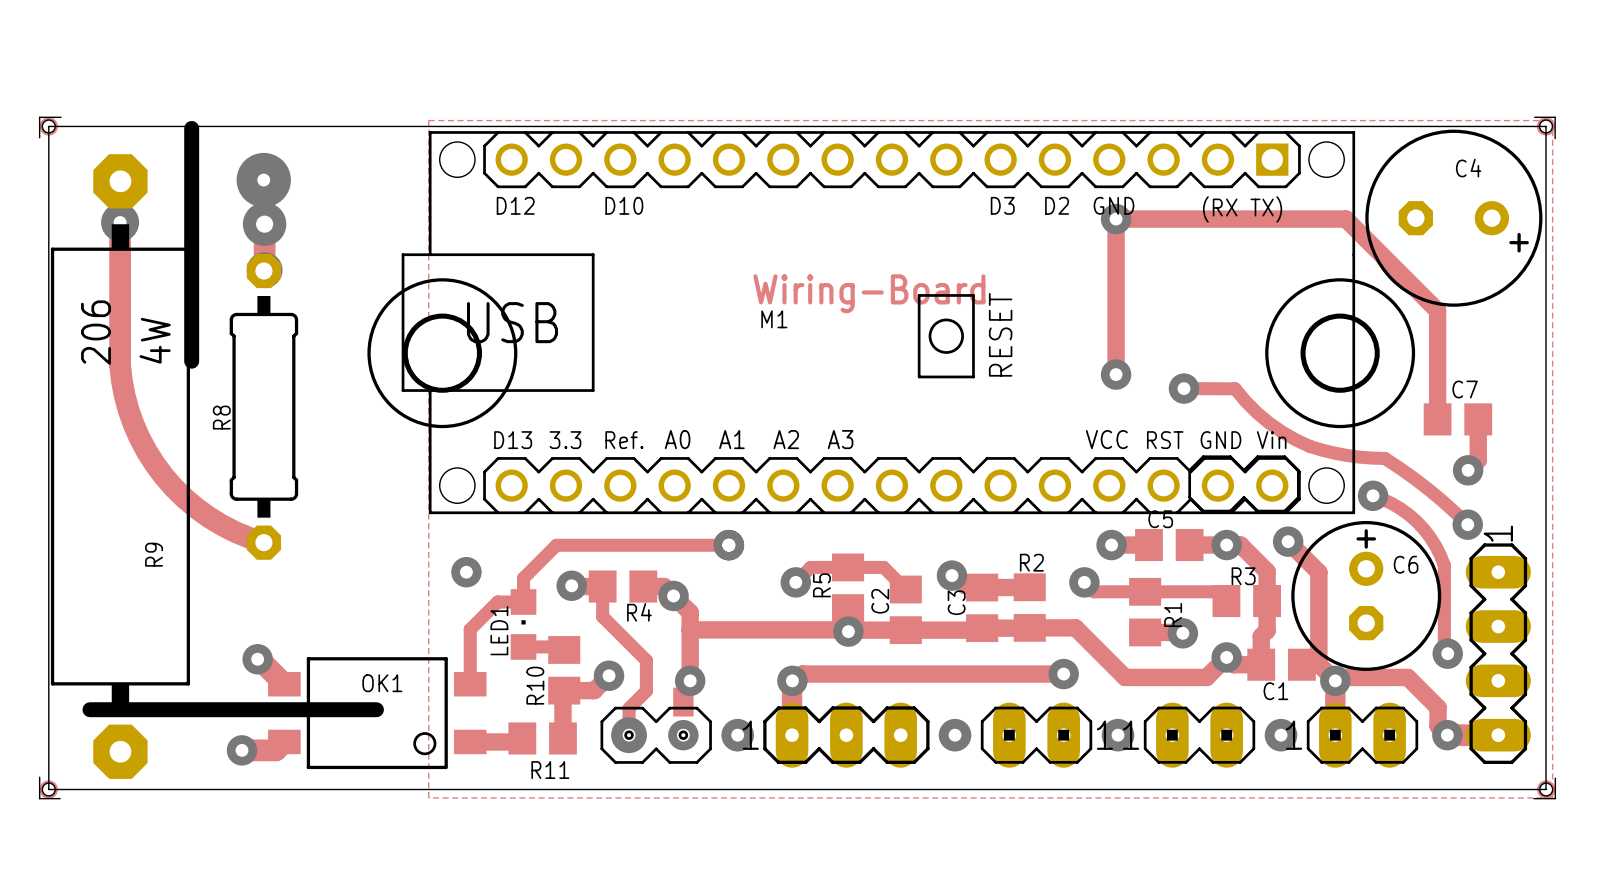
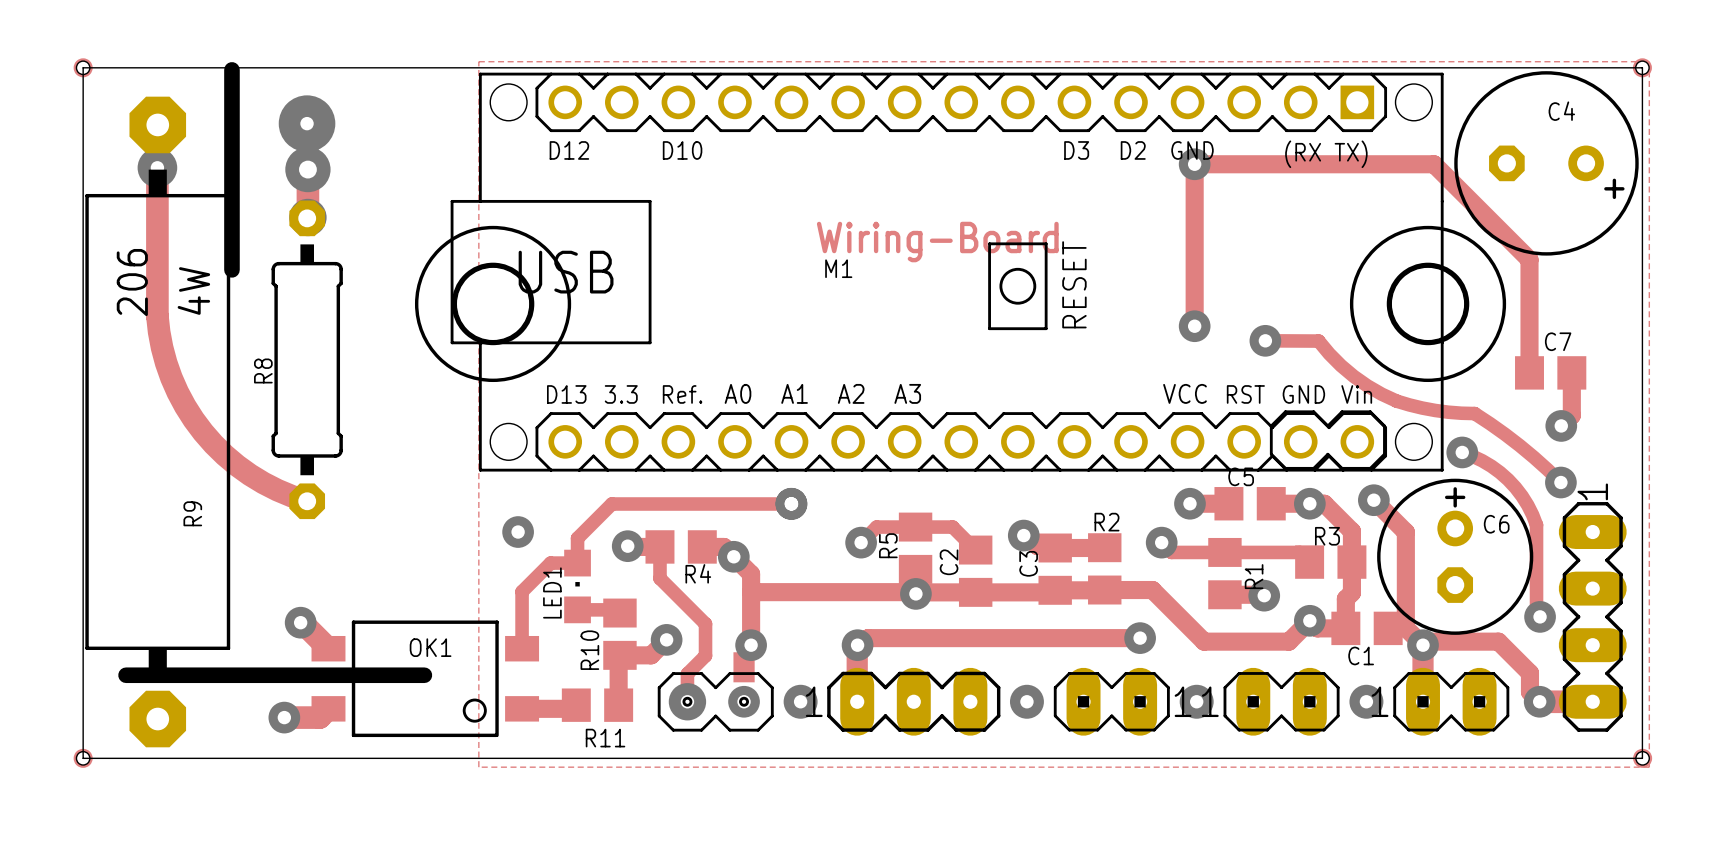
board edge: (61, 117) (39, 117) (39, 137) -> none
board edge: (1534, 117) (1555, 117) (1555, 138) -> none
board edge: (191, 320) (191, 361) -> none
board edge: (39, 777) (39, 798) (60, 798) -> none
board edge: (1555, 778) (1555, 798) (1533, 798) -> none

